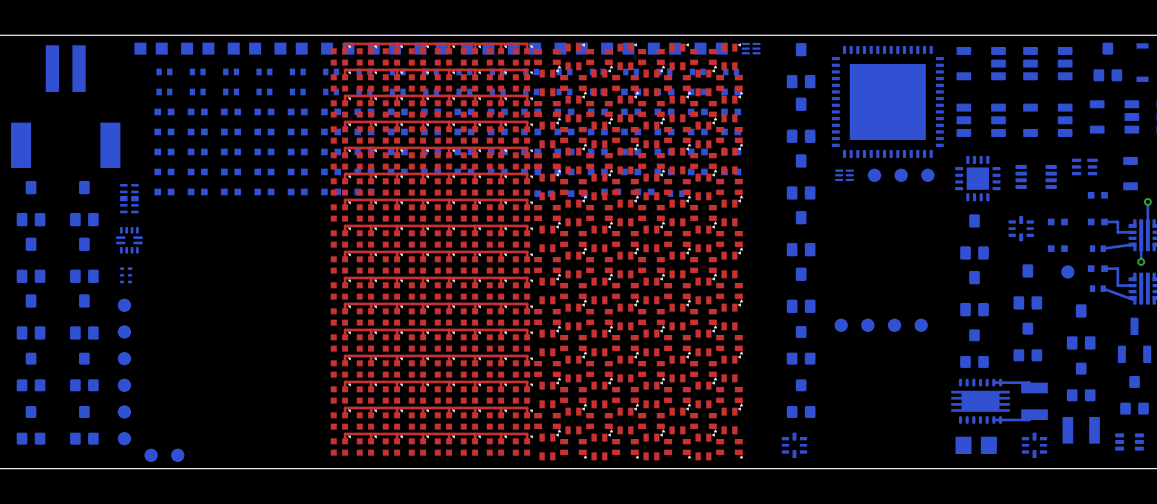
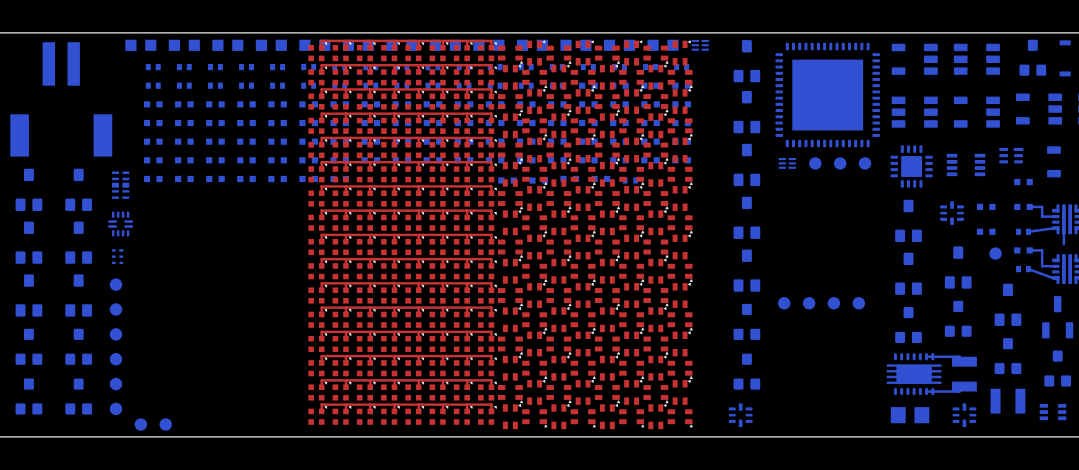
bottom track: (1147, 201) (1147, 235) -> none
via: (1147, 201) -> none
via: (1141, 261) -> none

